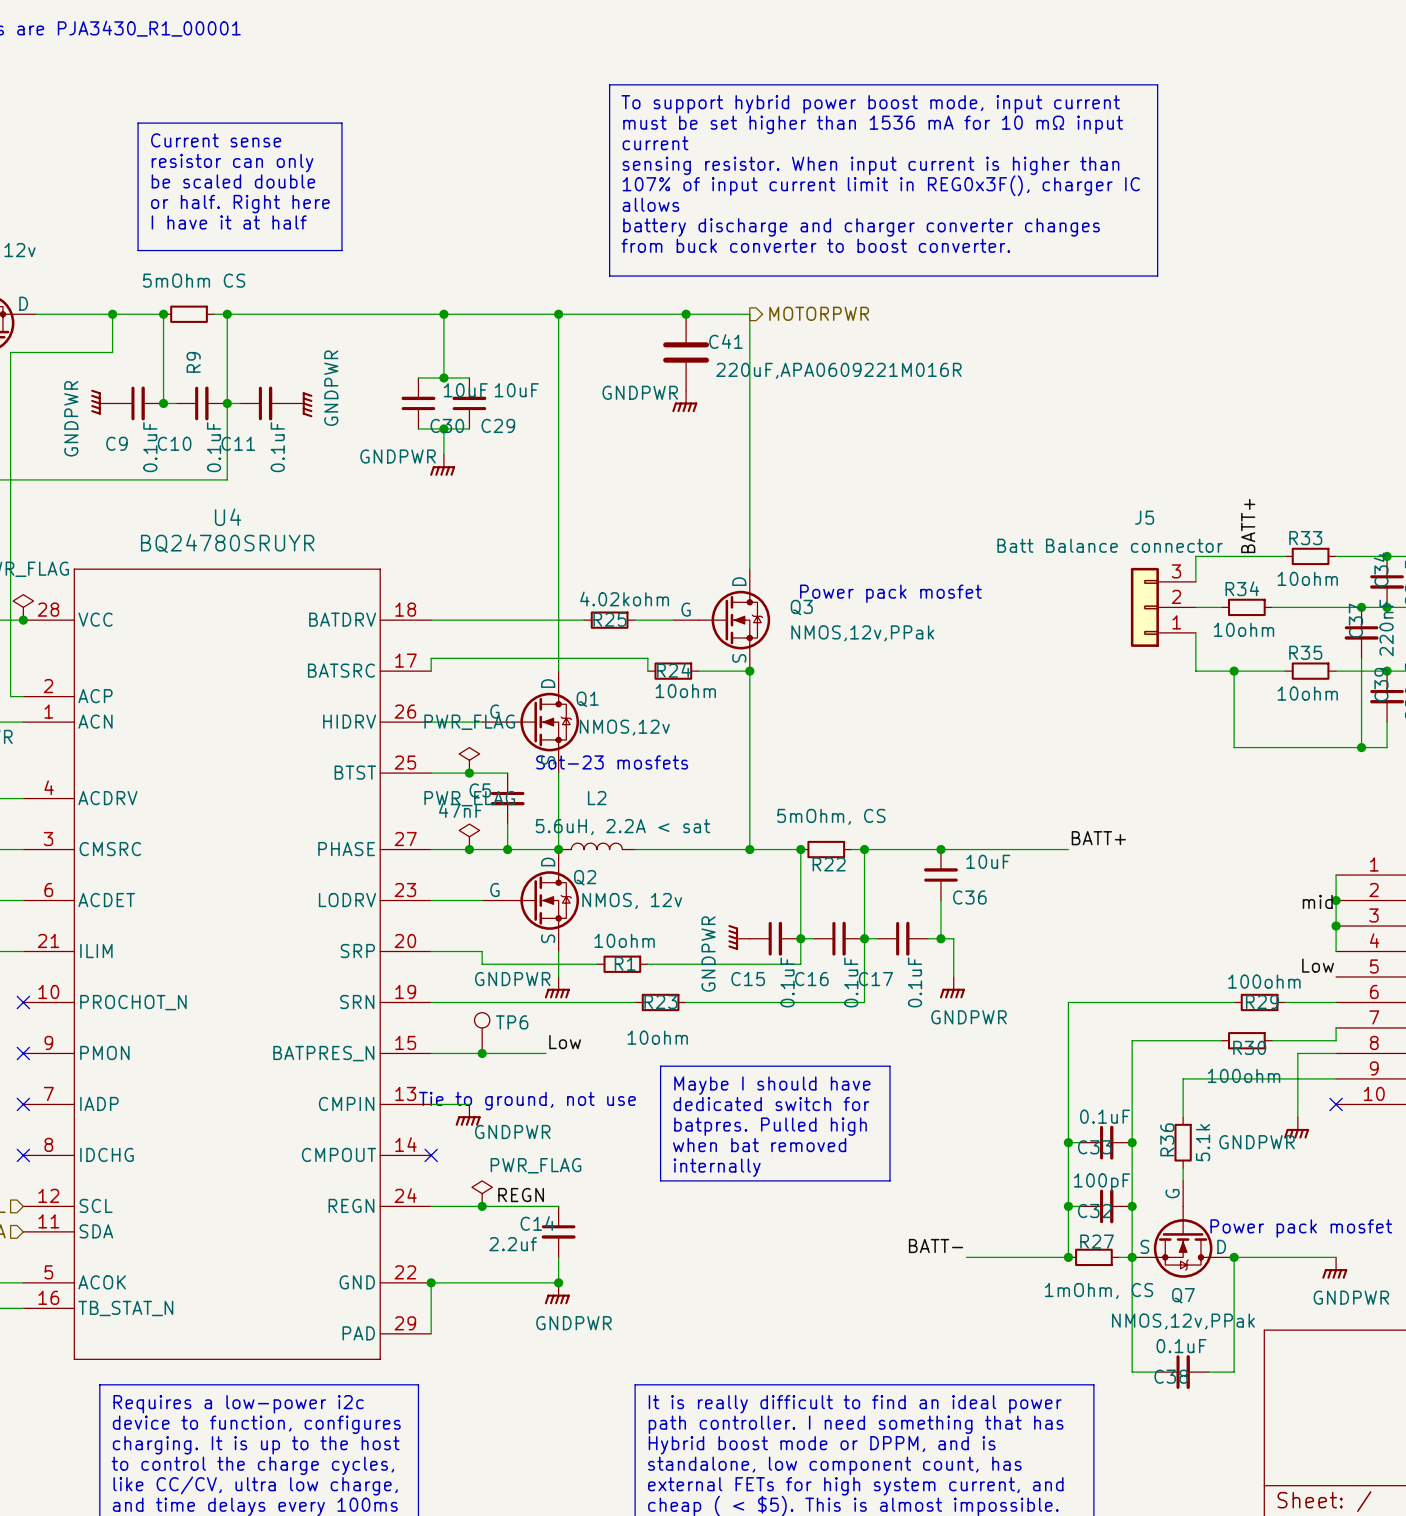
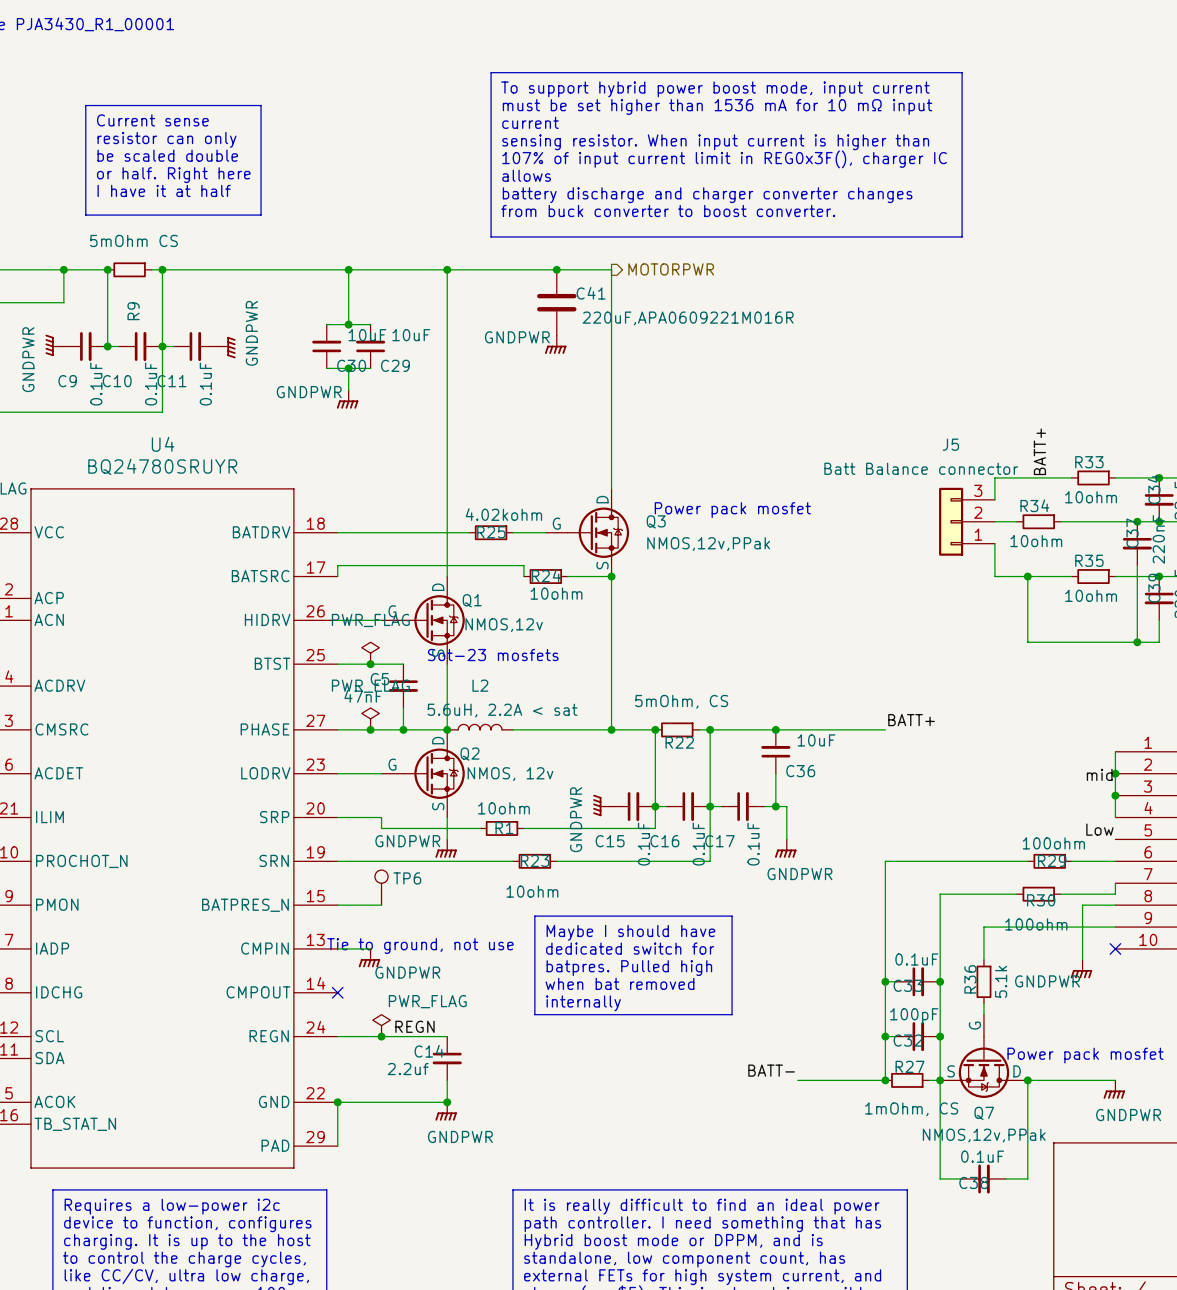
label: Low (565, 1042) -> none
wire: (482, 1053) (545, 1053) -> none
junction: (482, 1053) -> none

